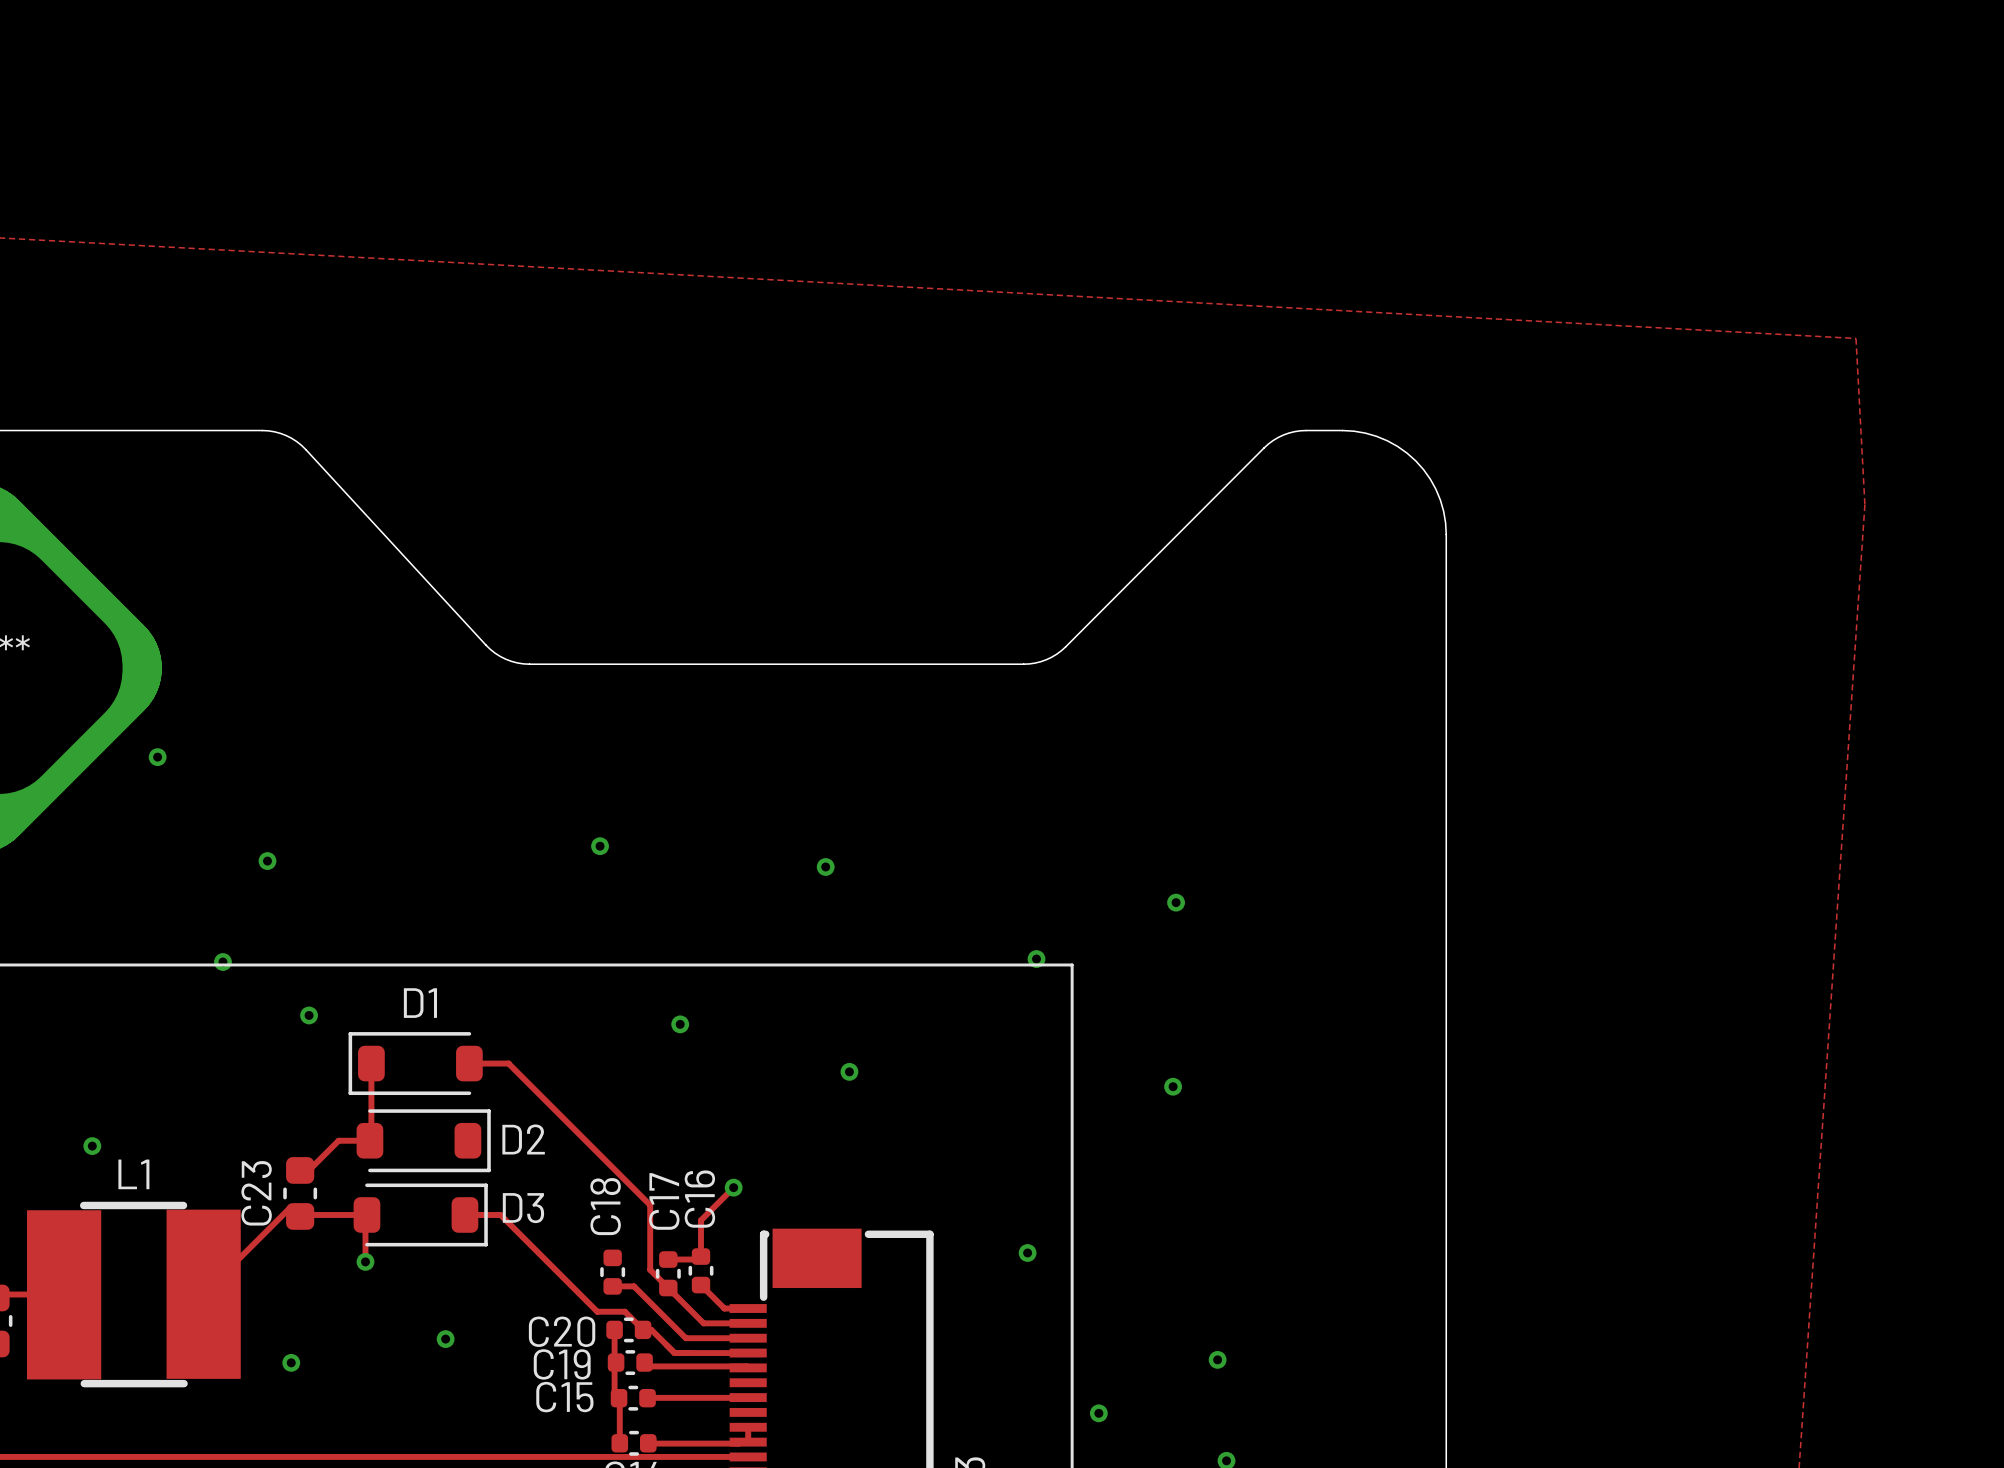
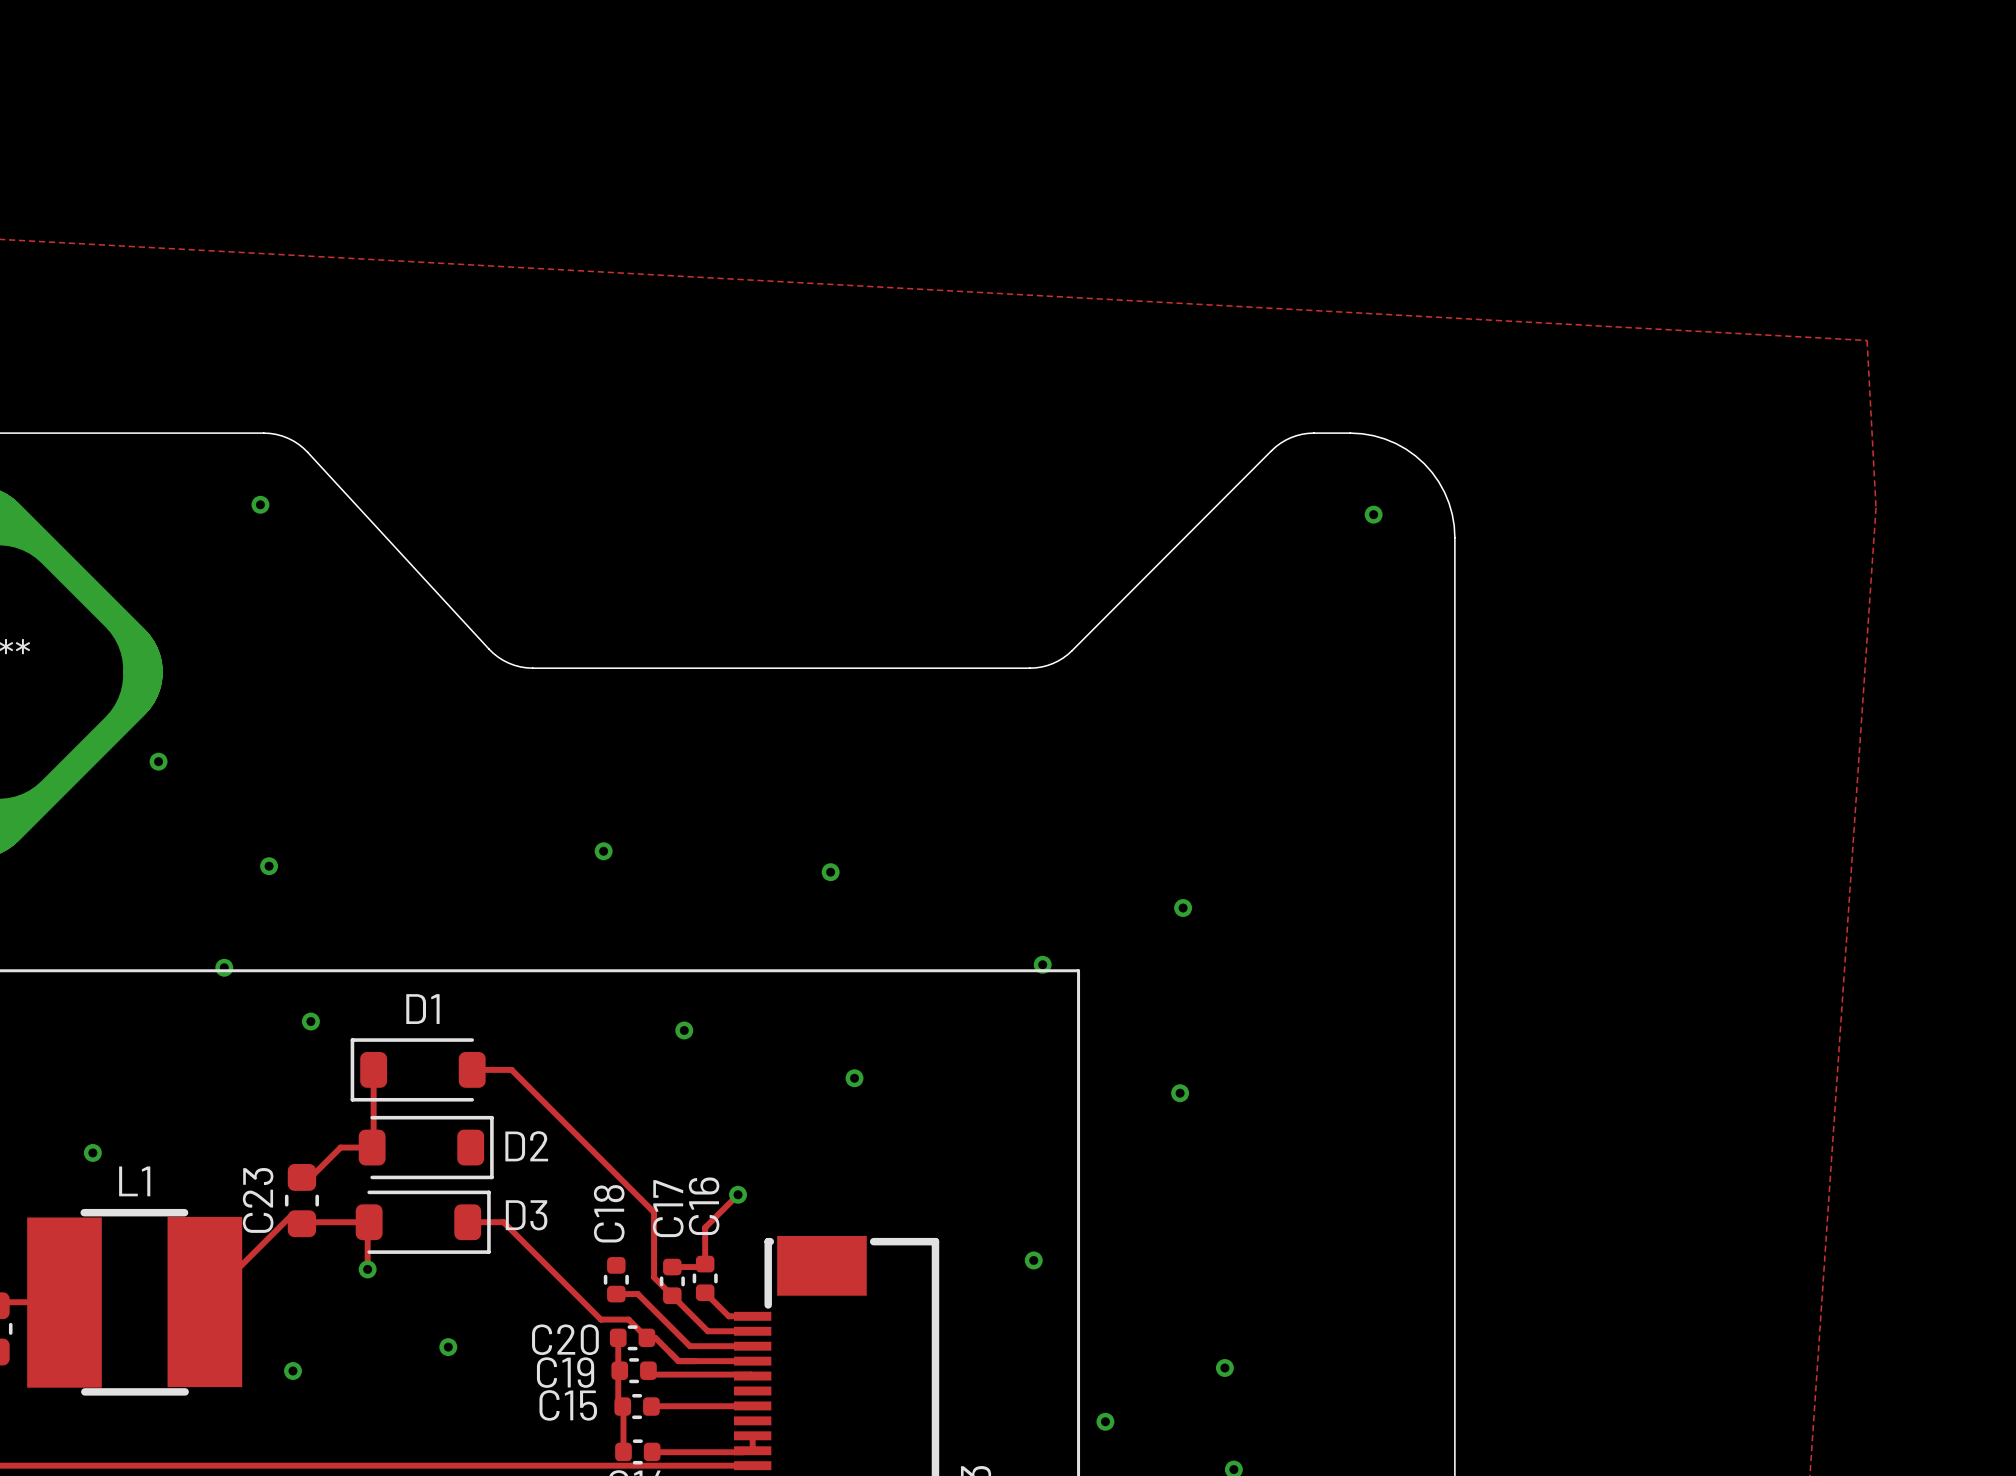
via: none -> (260, 504)
via: none -> (1373, 514)

